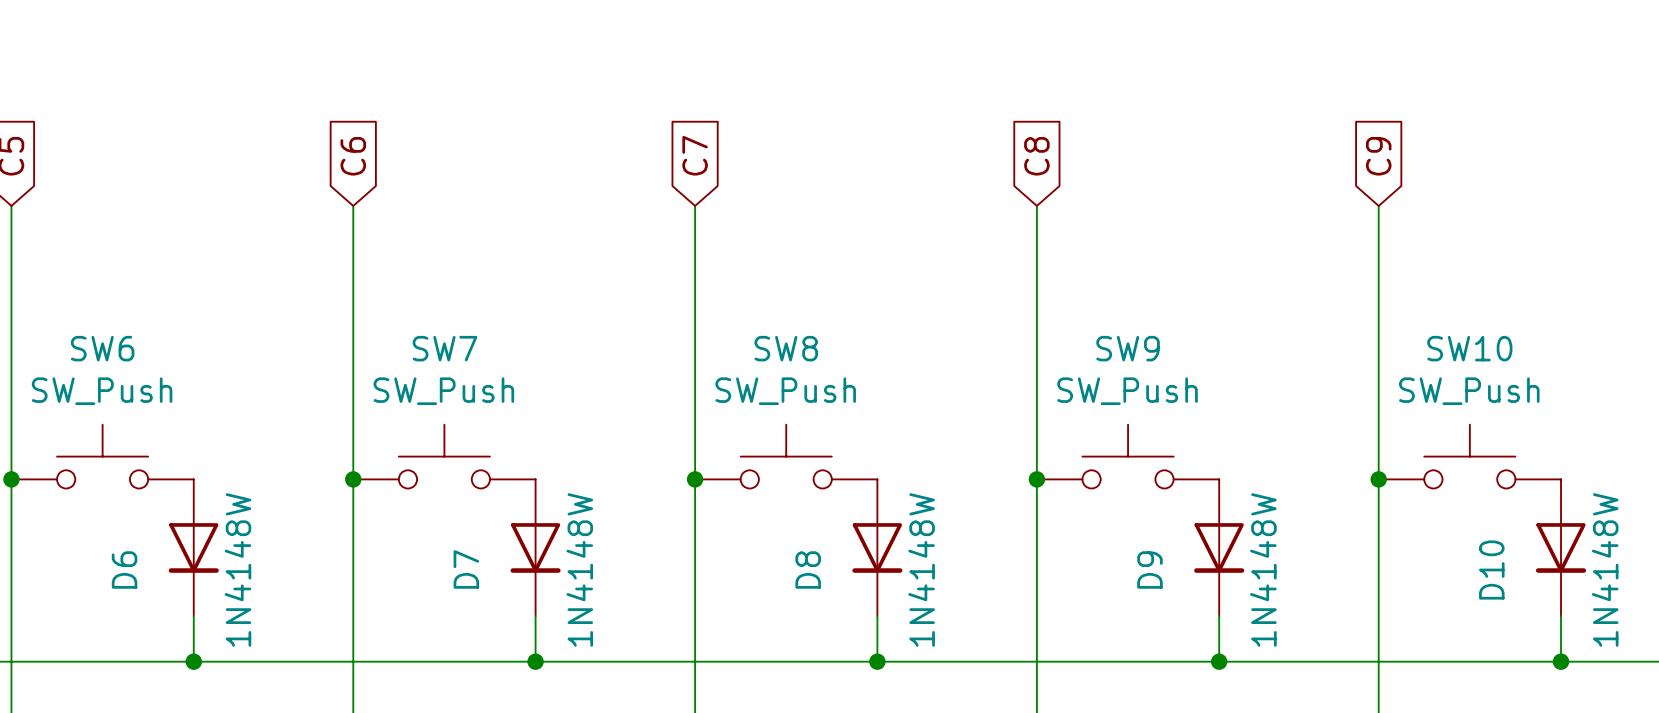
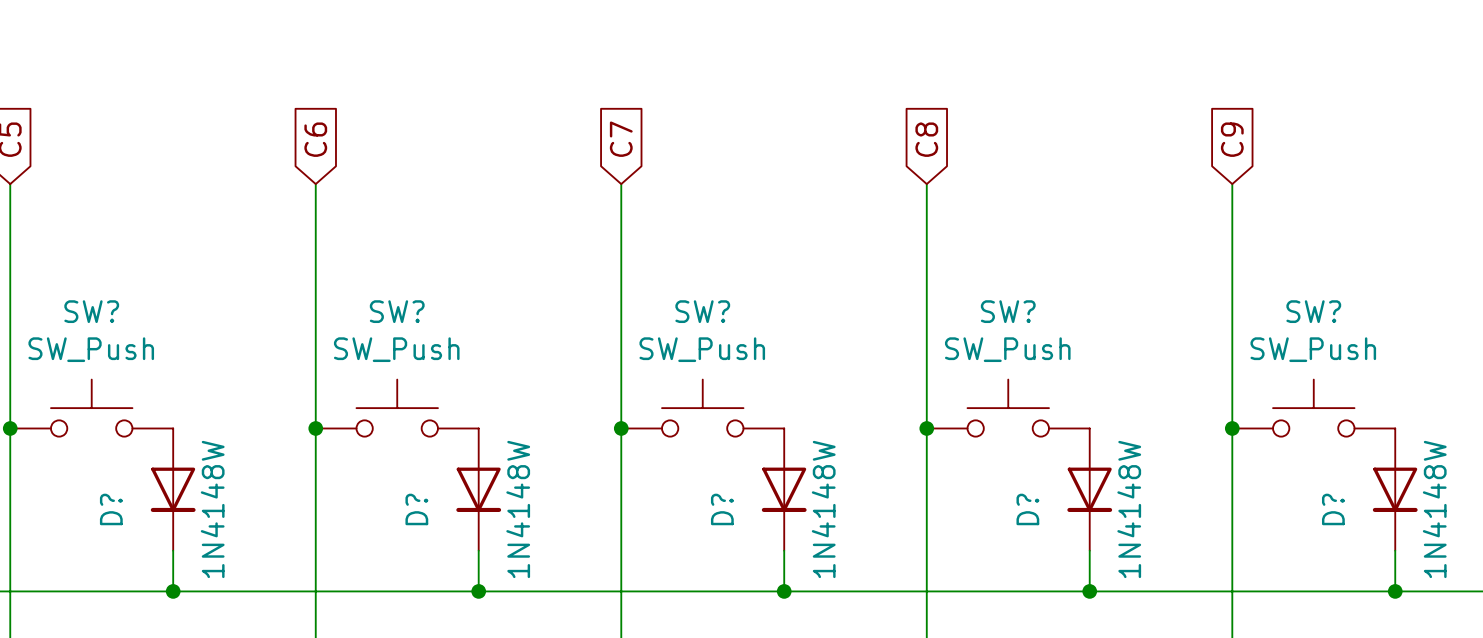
SW6 name: SW6 (102, 348) -> SW? (91, 311)
SW7 name: SW7 (444, 348) -> SW? (397, 311)
SW8 name: SW8 (786, 348) -> SW? (702, 311)
SW9 name: SW9 (1128, 348) -> SW? (1008, 311)
SW10 name: SW10 (1469, 348) -> SW? (1313, 311)
D6 name: D6 (124, 569) -> D? (111, 509)
D7 name: D7 (466, 569) -> D? (416, 509)
D8 name: D8 (808, 569) -> D? (722, 509)
D9 name: D9 (1149, 569) -> D? (1027, 509)
D10 name: D10 (1491, 569) -> D? (1333, 509)

